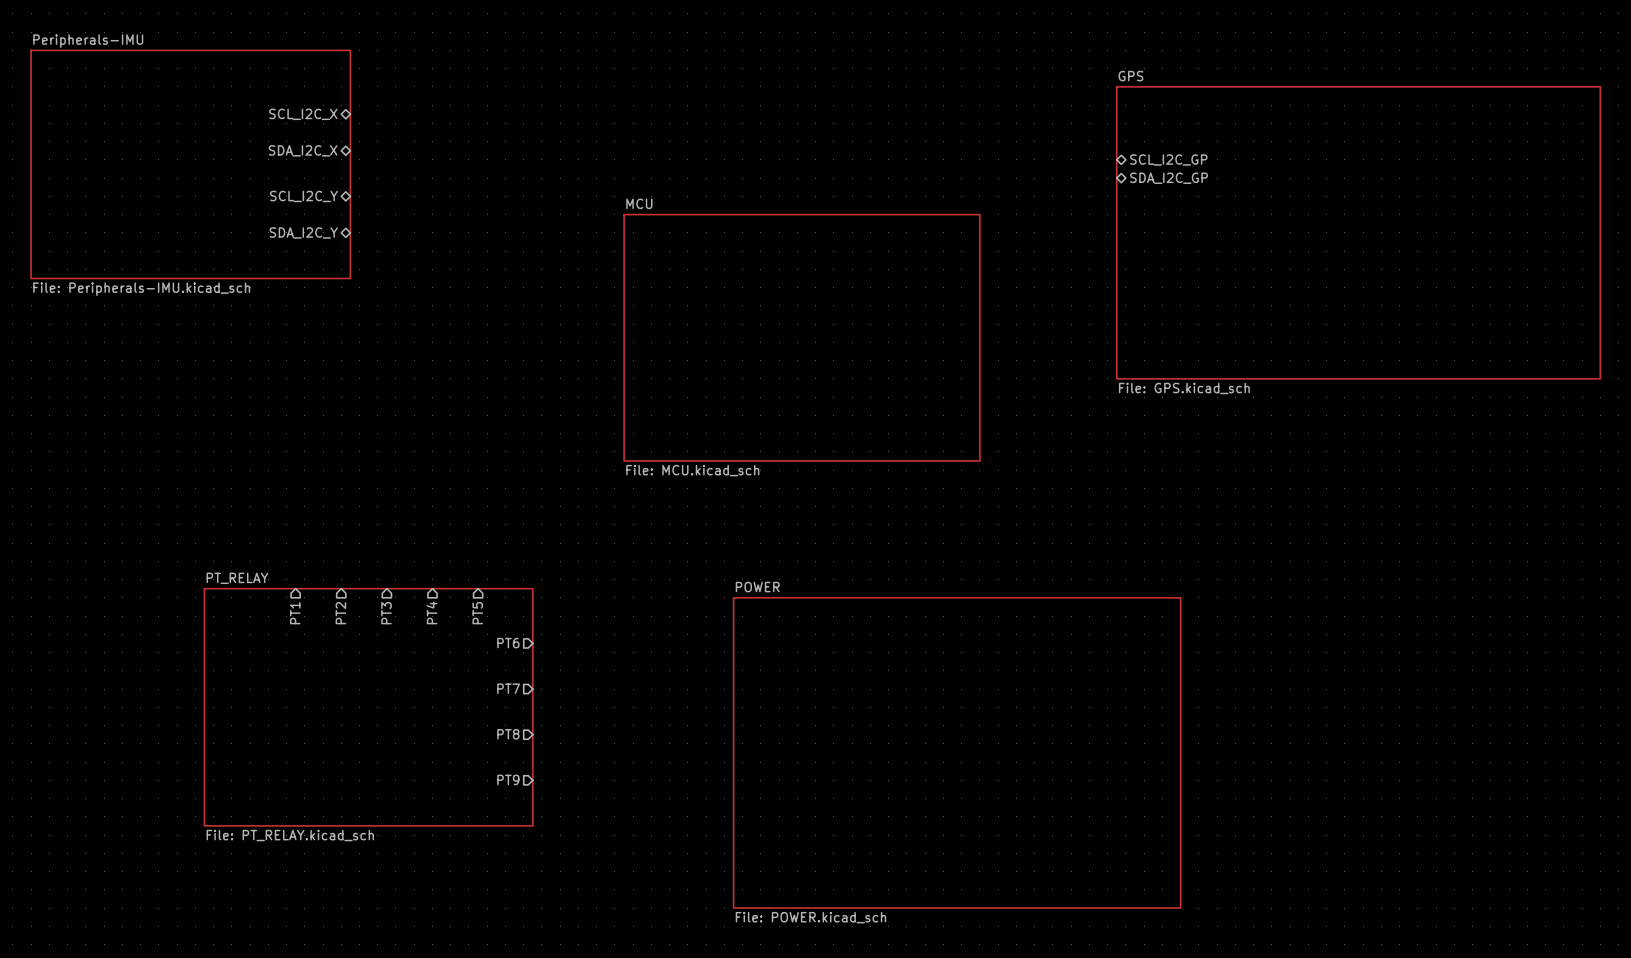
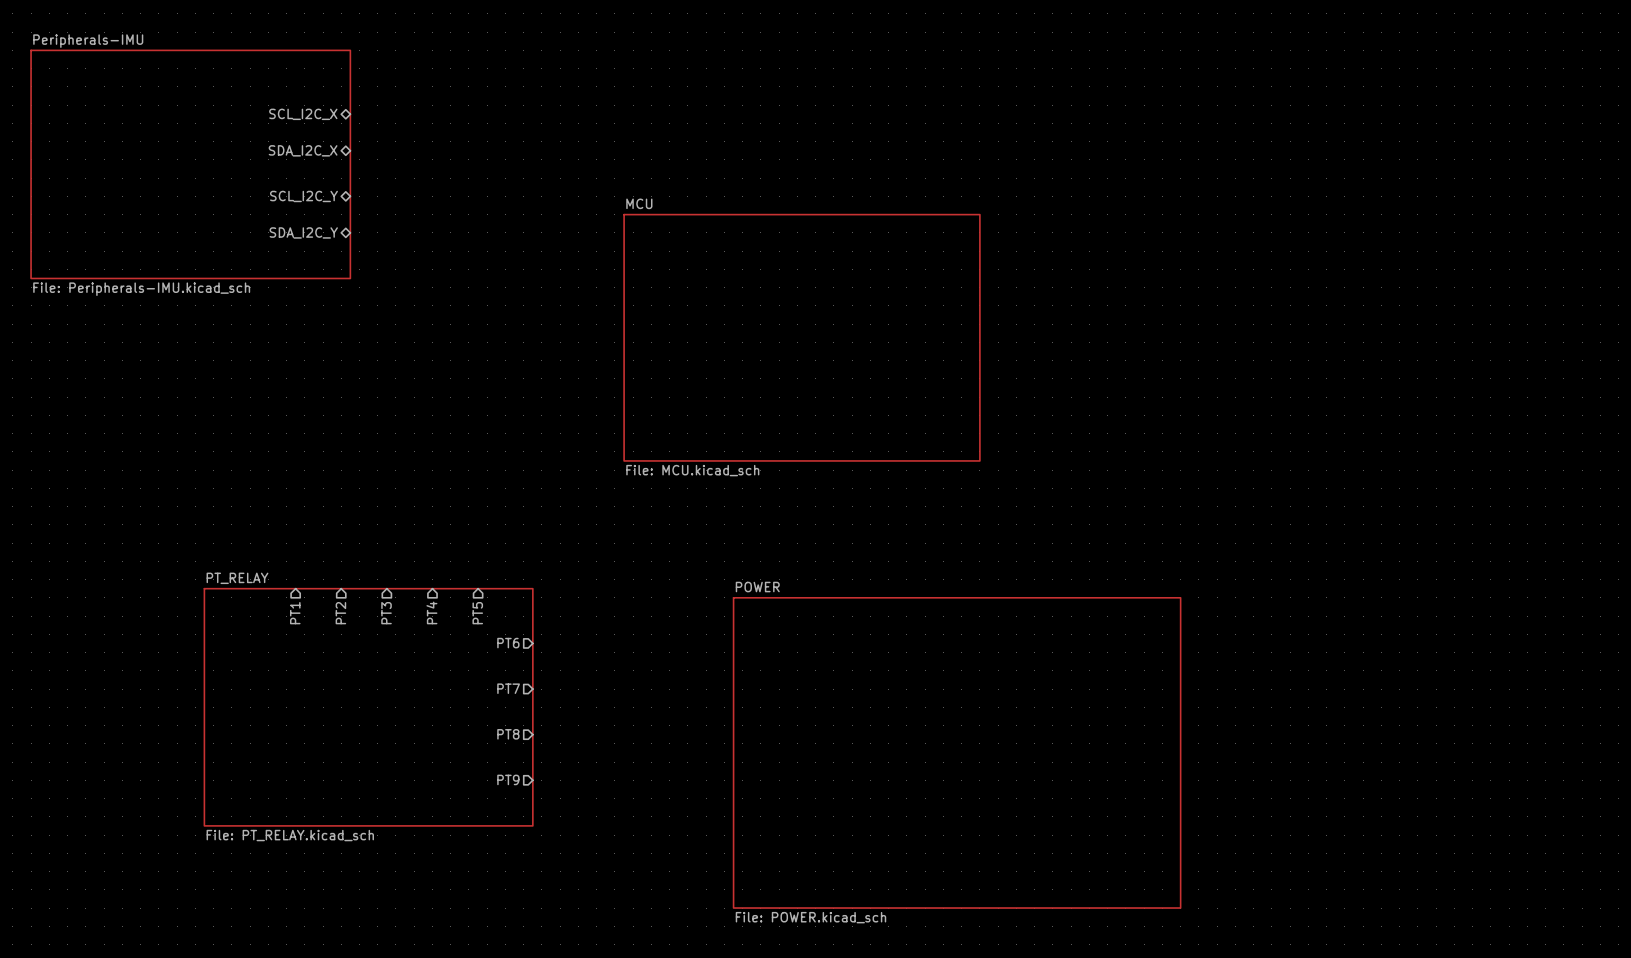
sheet pin: SCL_I2C_GP (1168, 159) -> none
sheet pin: SDA_I2C_GP (1169, 178) -> none
sheet GPS: File: GPS.kicad_sch (1358, 232) -> none

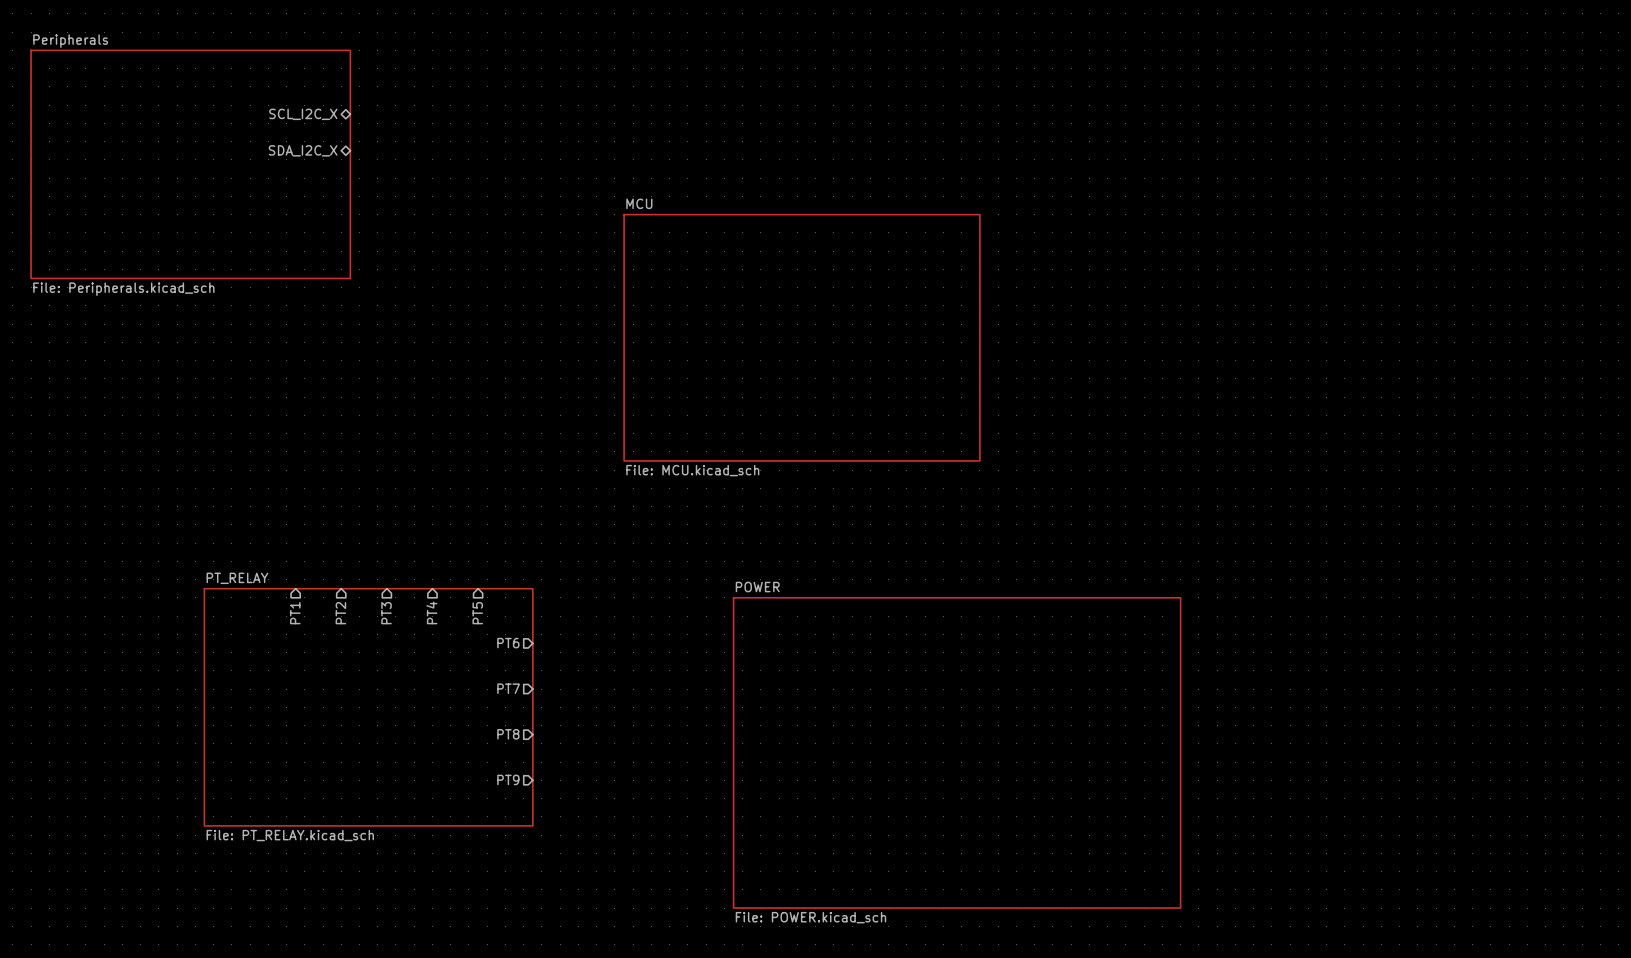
sheet Peripherals-IMU name: Peripherals-IMU (88, 41) -> Peripherals (70, 41)
sheet pin: SCL_I2C_Y (303, 196) -> none
sheet pin: SDA_I2C_Y (303, 232) -> none
sheet Peripherals-IMU value: File: Peripherals-IMU.kicad_sch (141, 289) -> File: Peripherals.kicad_sch (123, 289)

